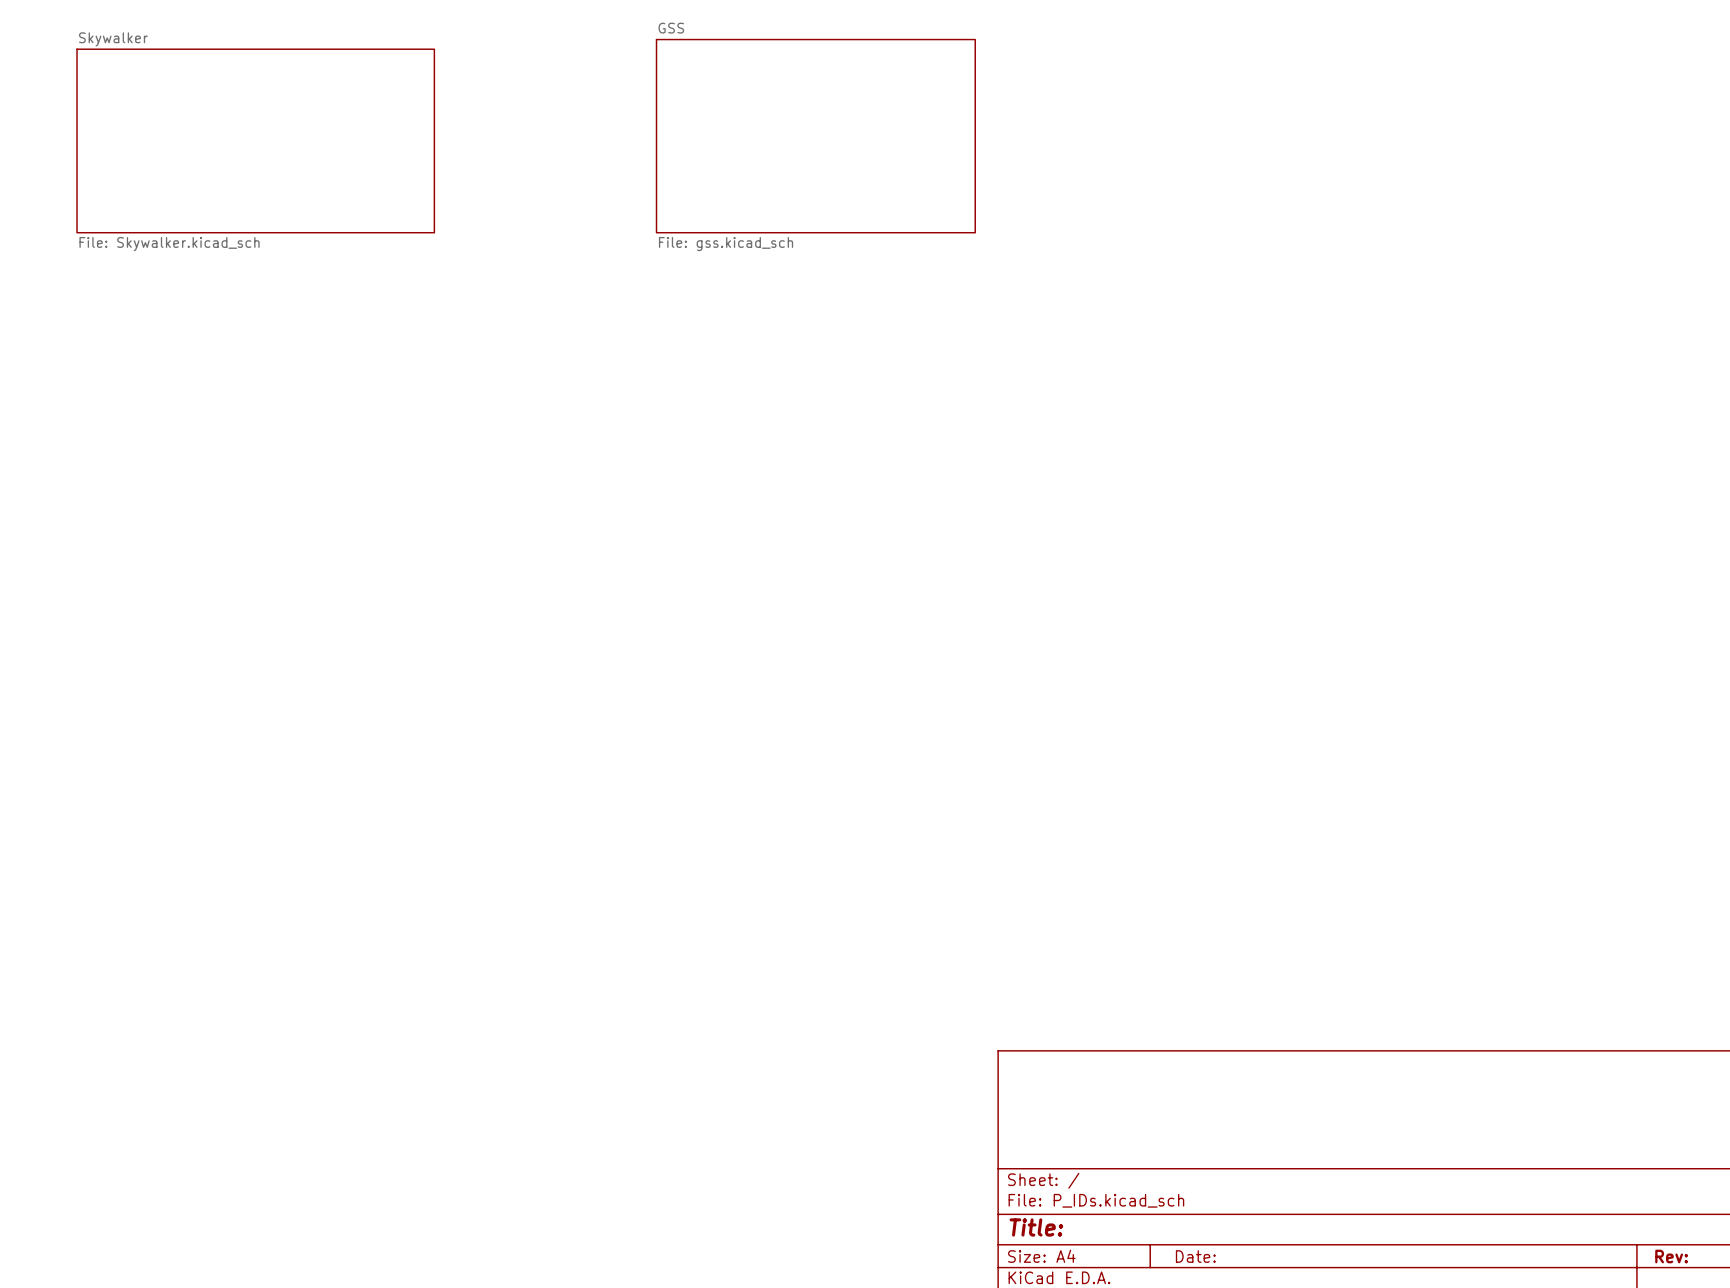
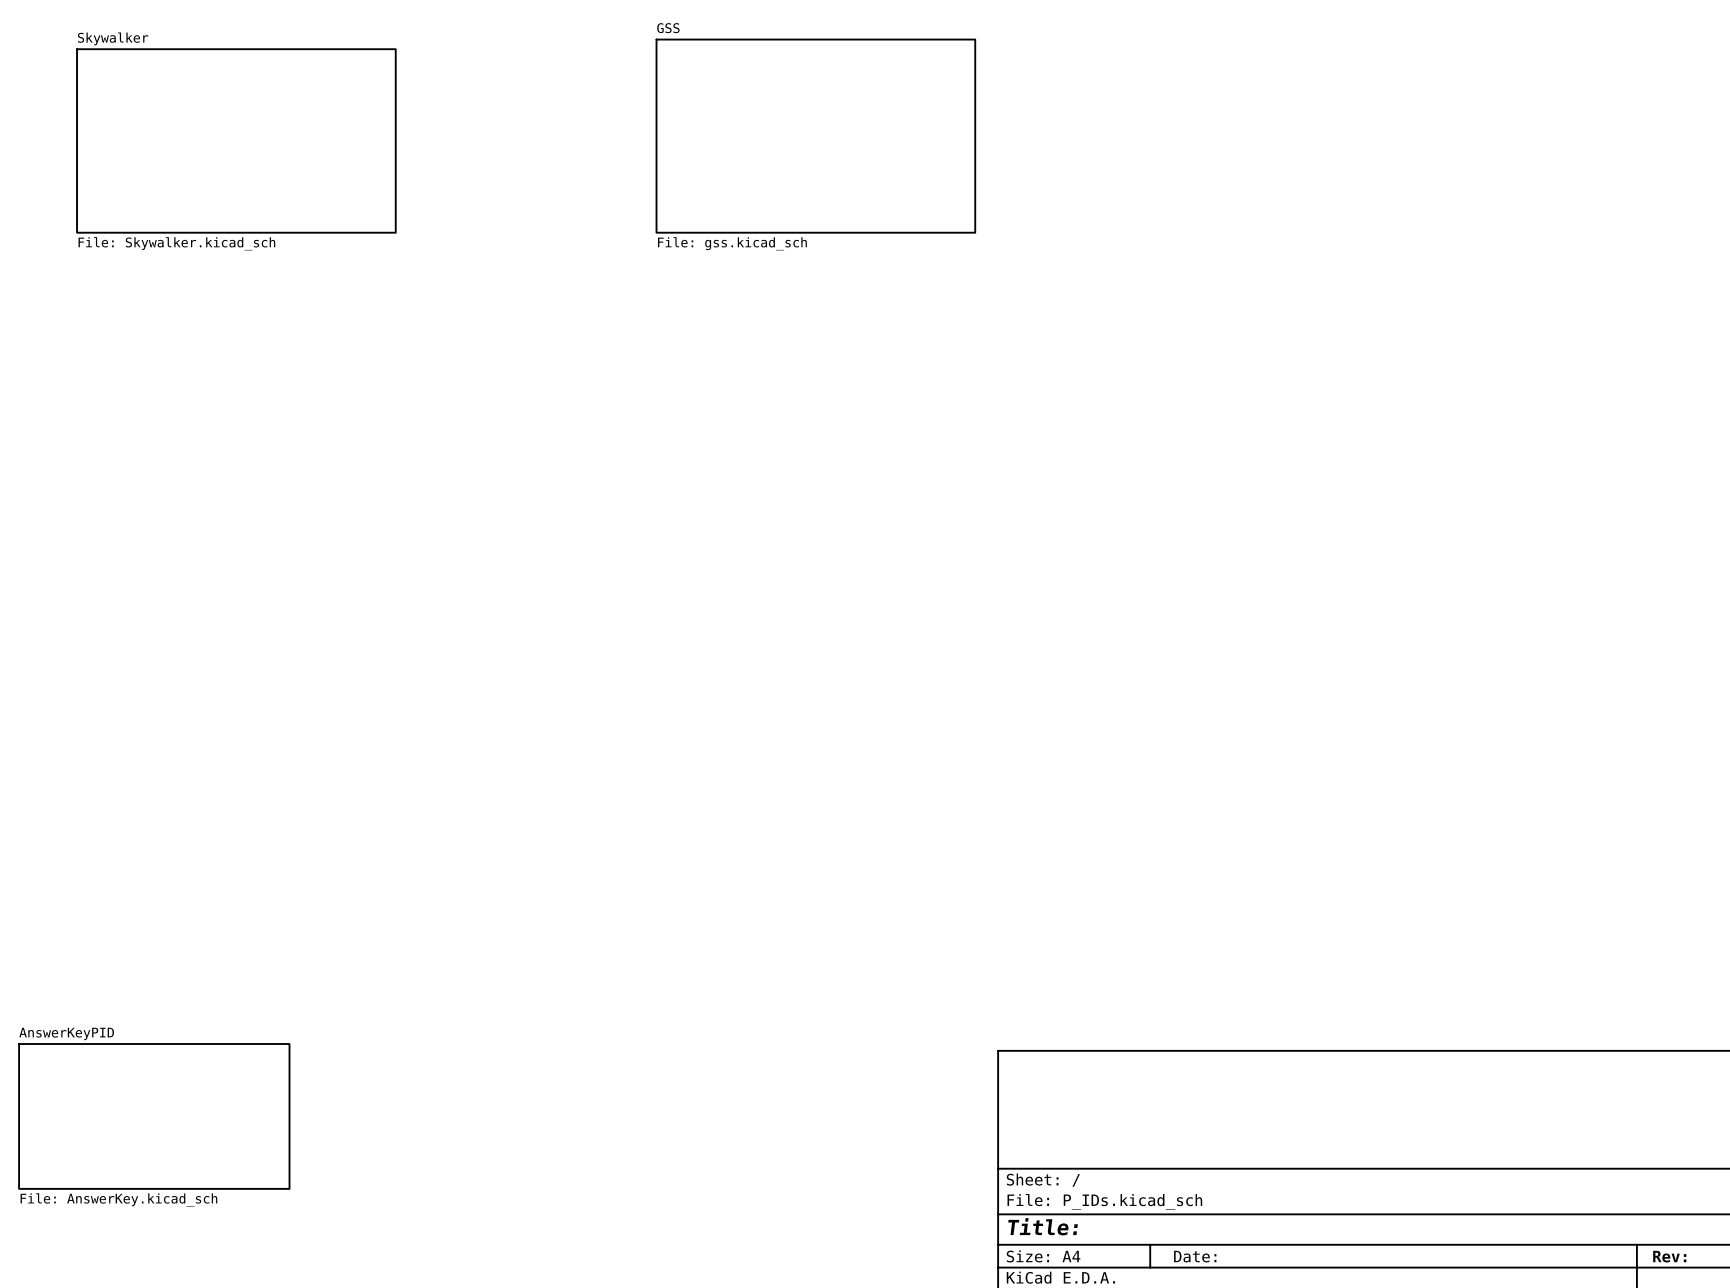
sheet Skywalker: none -> File: Skywalker.kicad_sch (236, 140)
sheet Skywalker: File: Skywalker.kicad_sch (255, 140) -> none
sheet AnswerKeyPID: none -> File: AnswerKey.kicad_sch (154, 1116)

